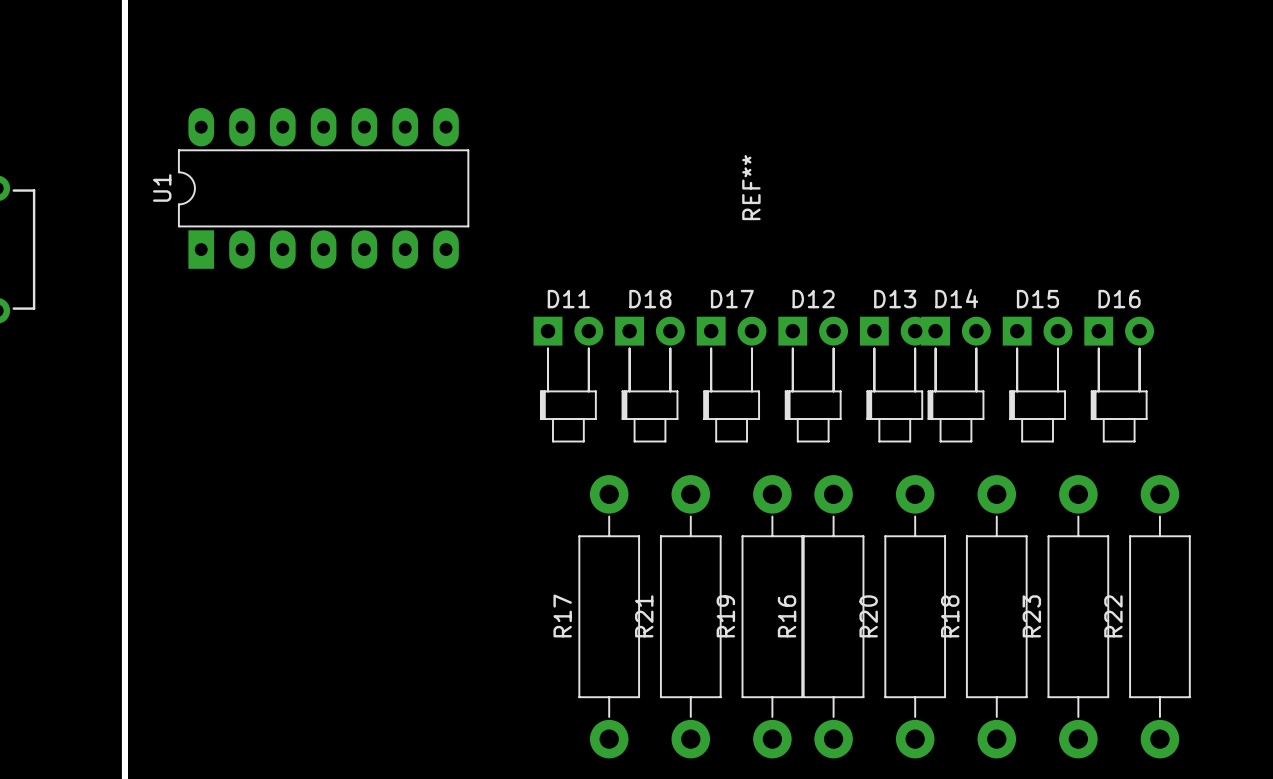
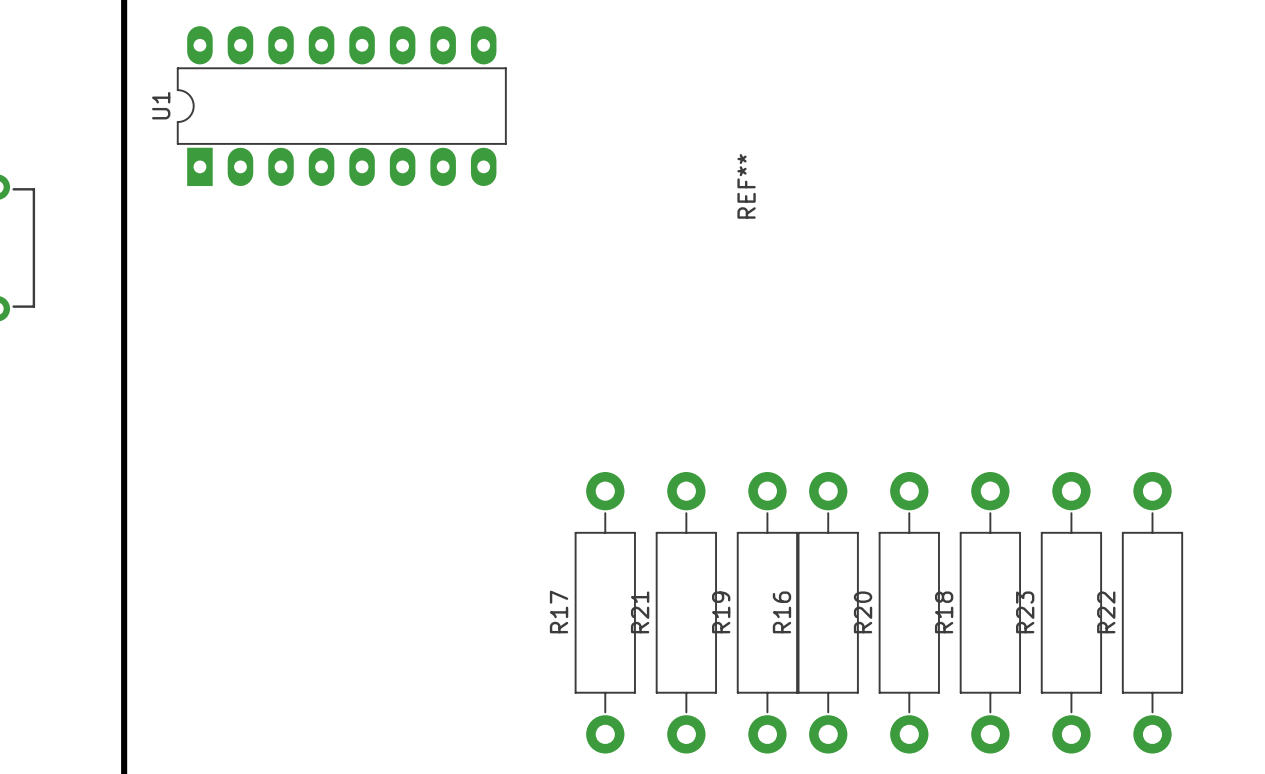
U1 footprint: [177, 107, 470, 269] -> [176, 26, 507, 187]
D11: (568, 379) -> none
D18: (650, 379) -> none
D17: (731, 379) -> none
D12: (813, 379) -> none
D13: (894, 379) -> none
D14: (955, 379) -> none
D15: (1037, 379) -> none
D16: (1119, 379) -> none

